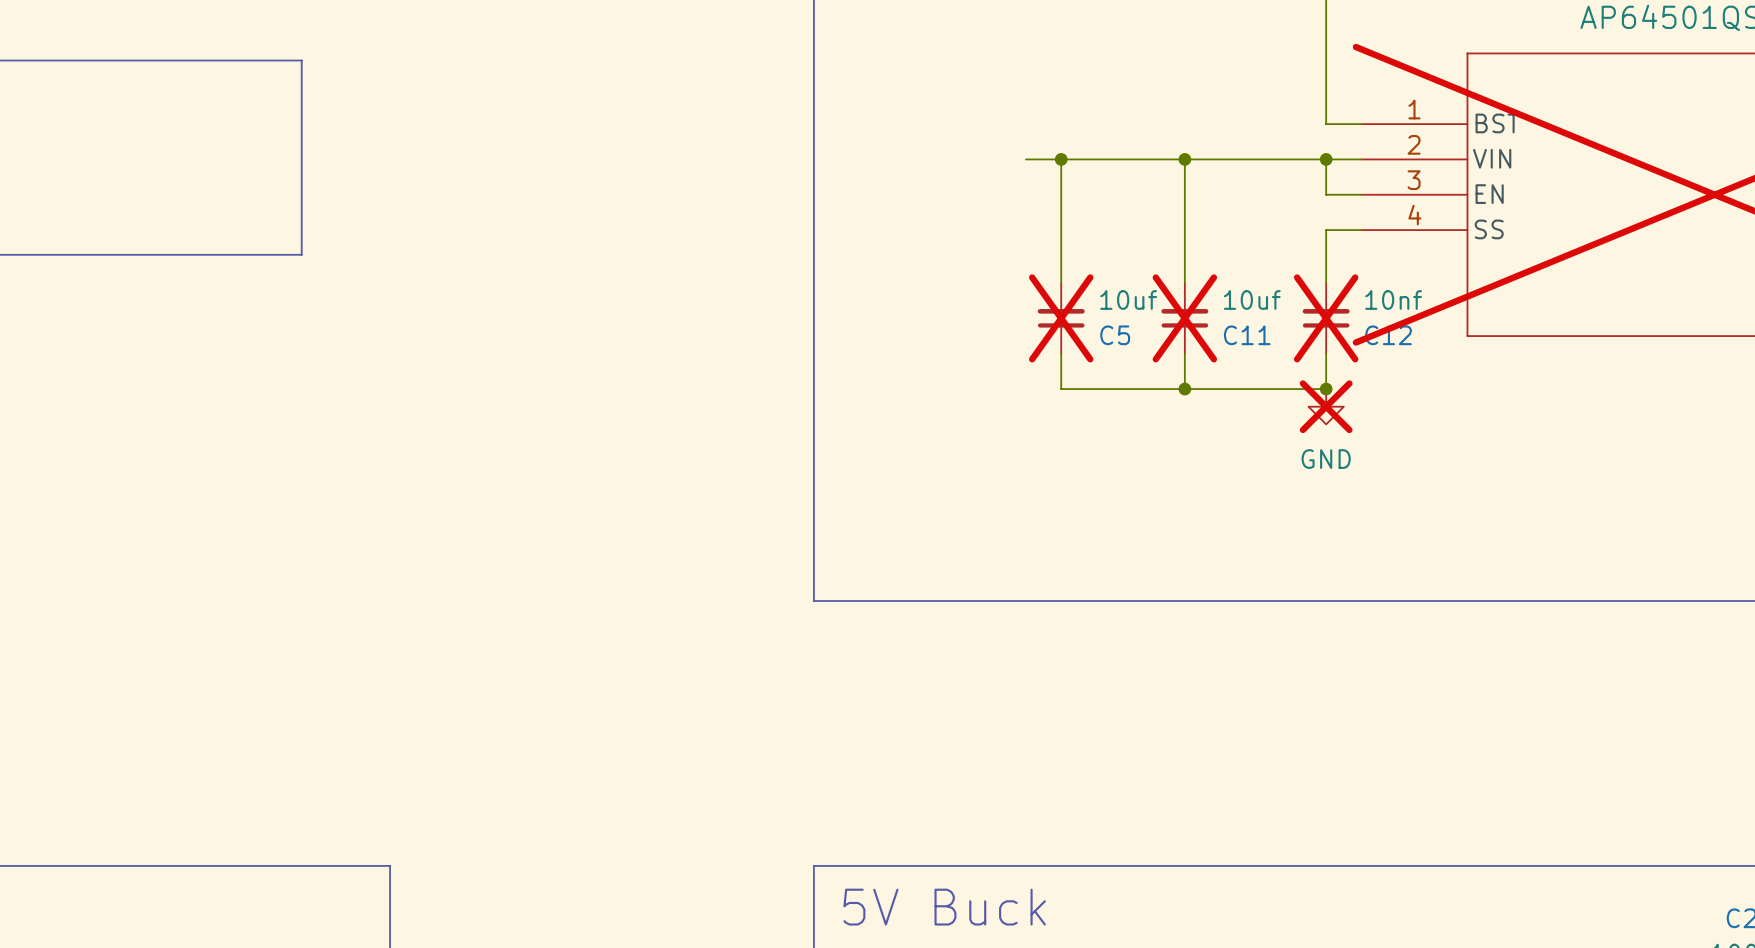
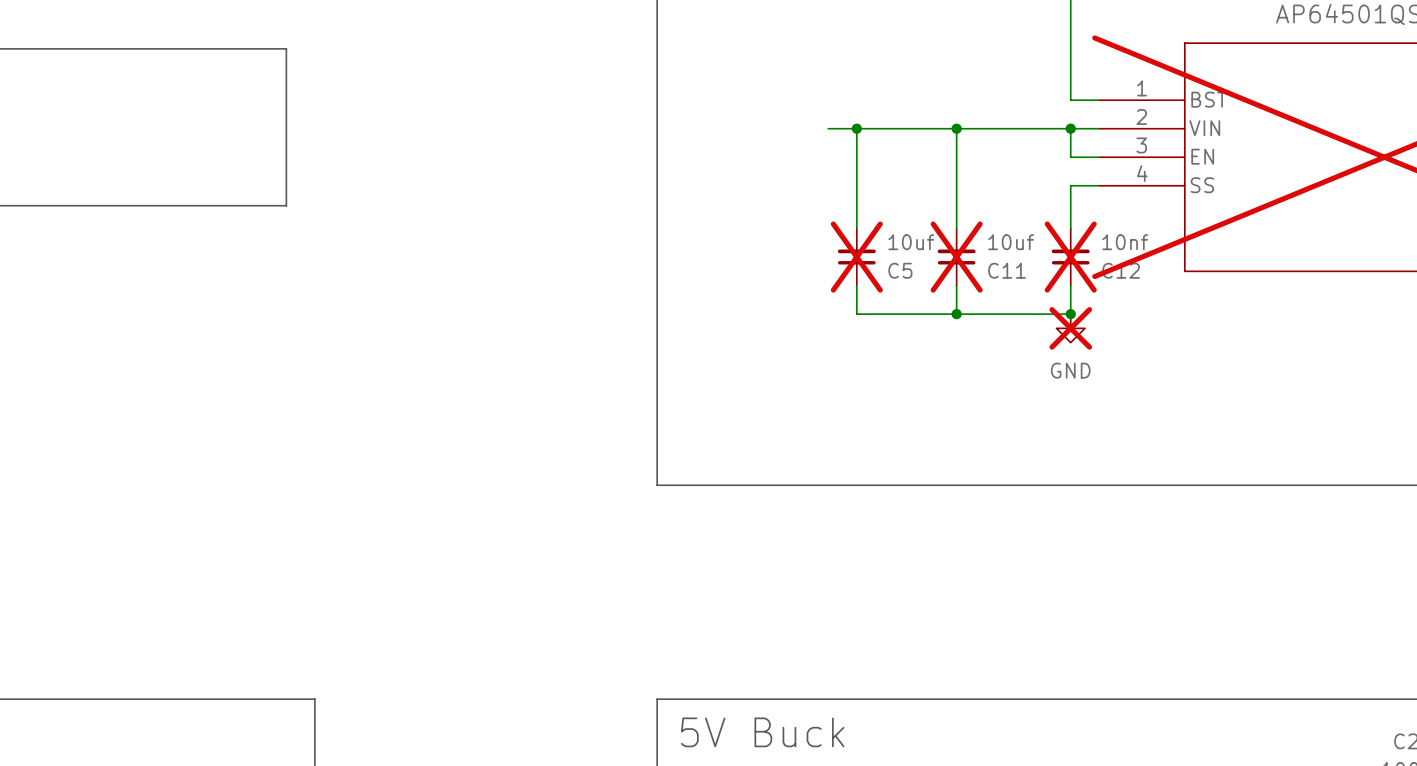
line: (301, 60) (301, 254) -> (243, 48) (286, 48) (286, 205) (243, 205)

